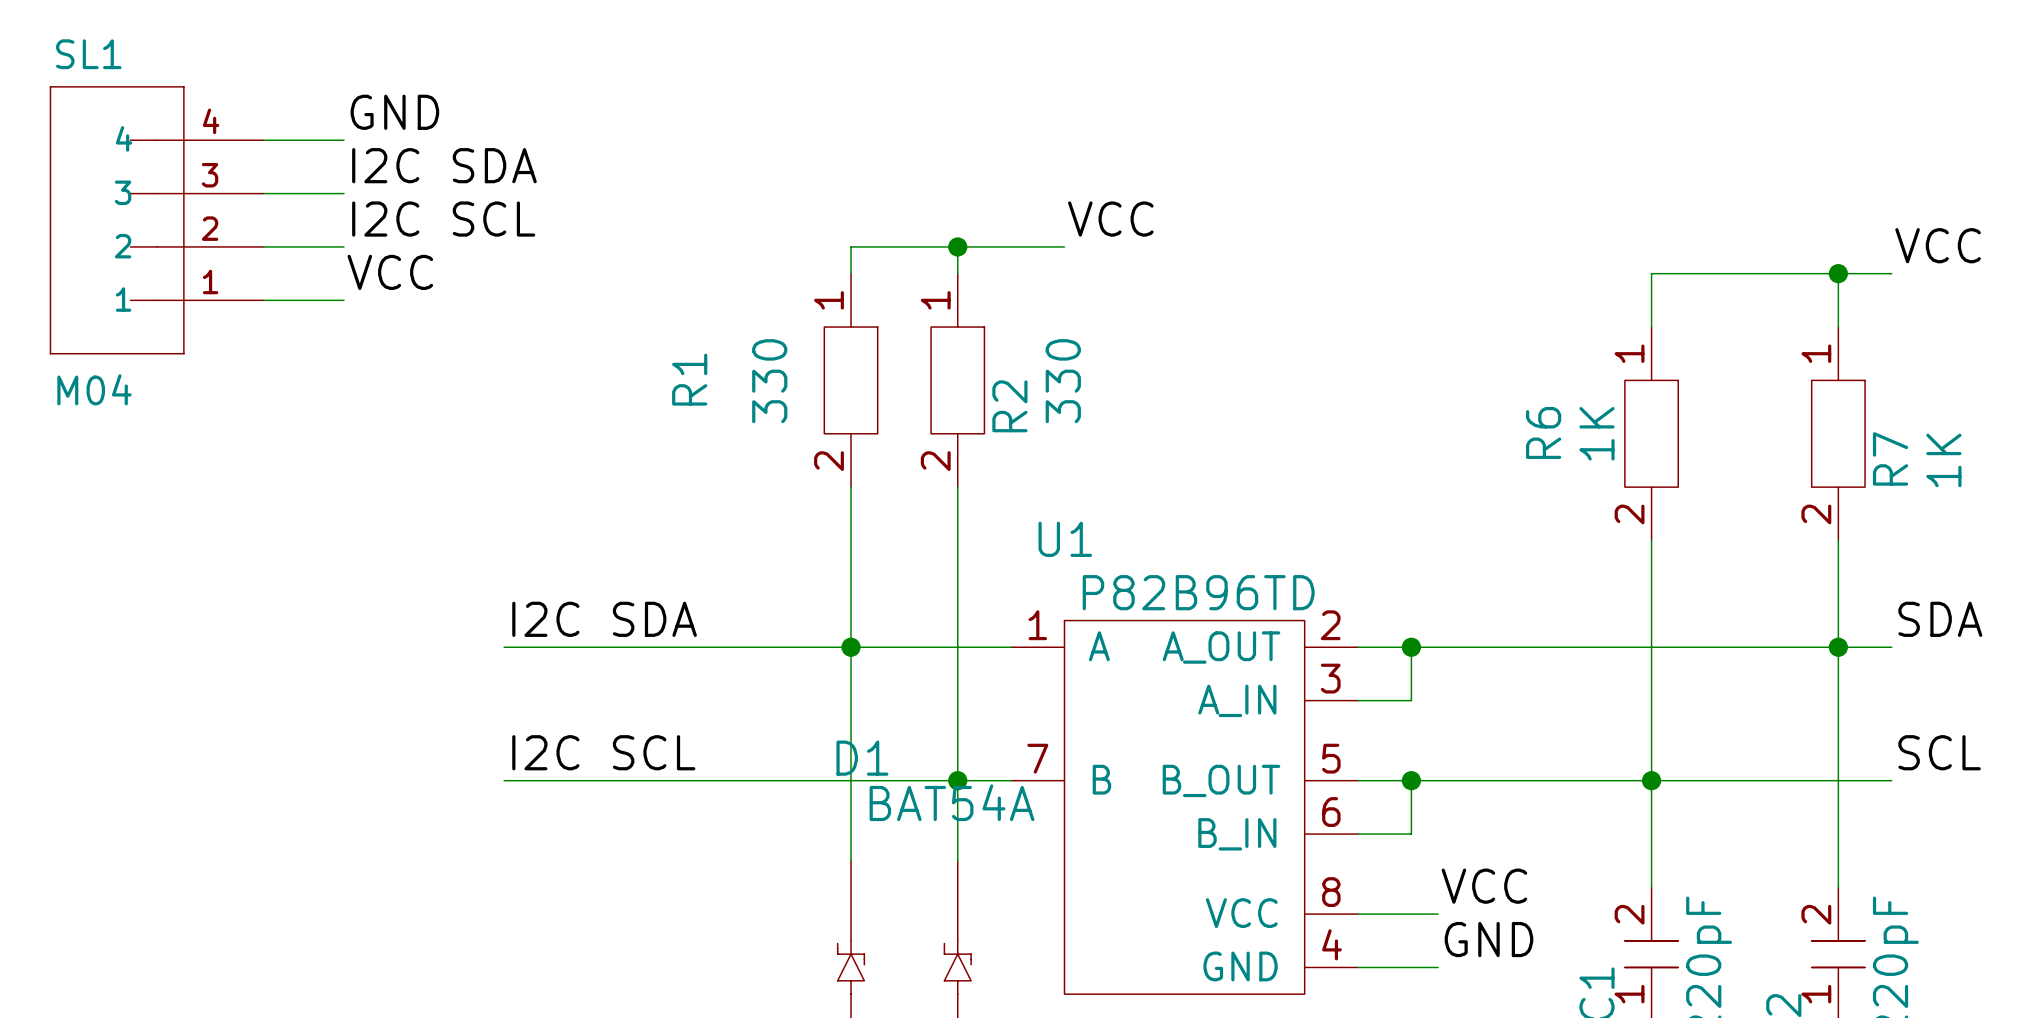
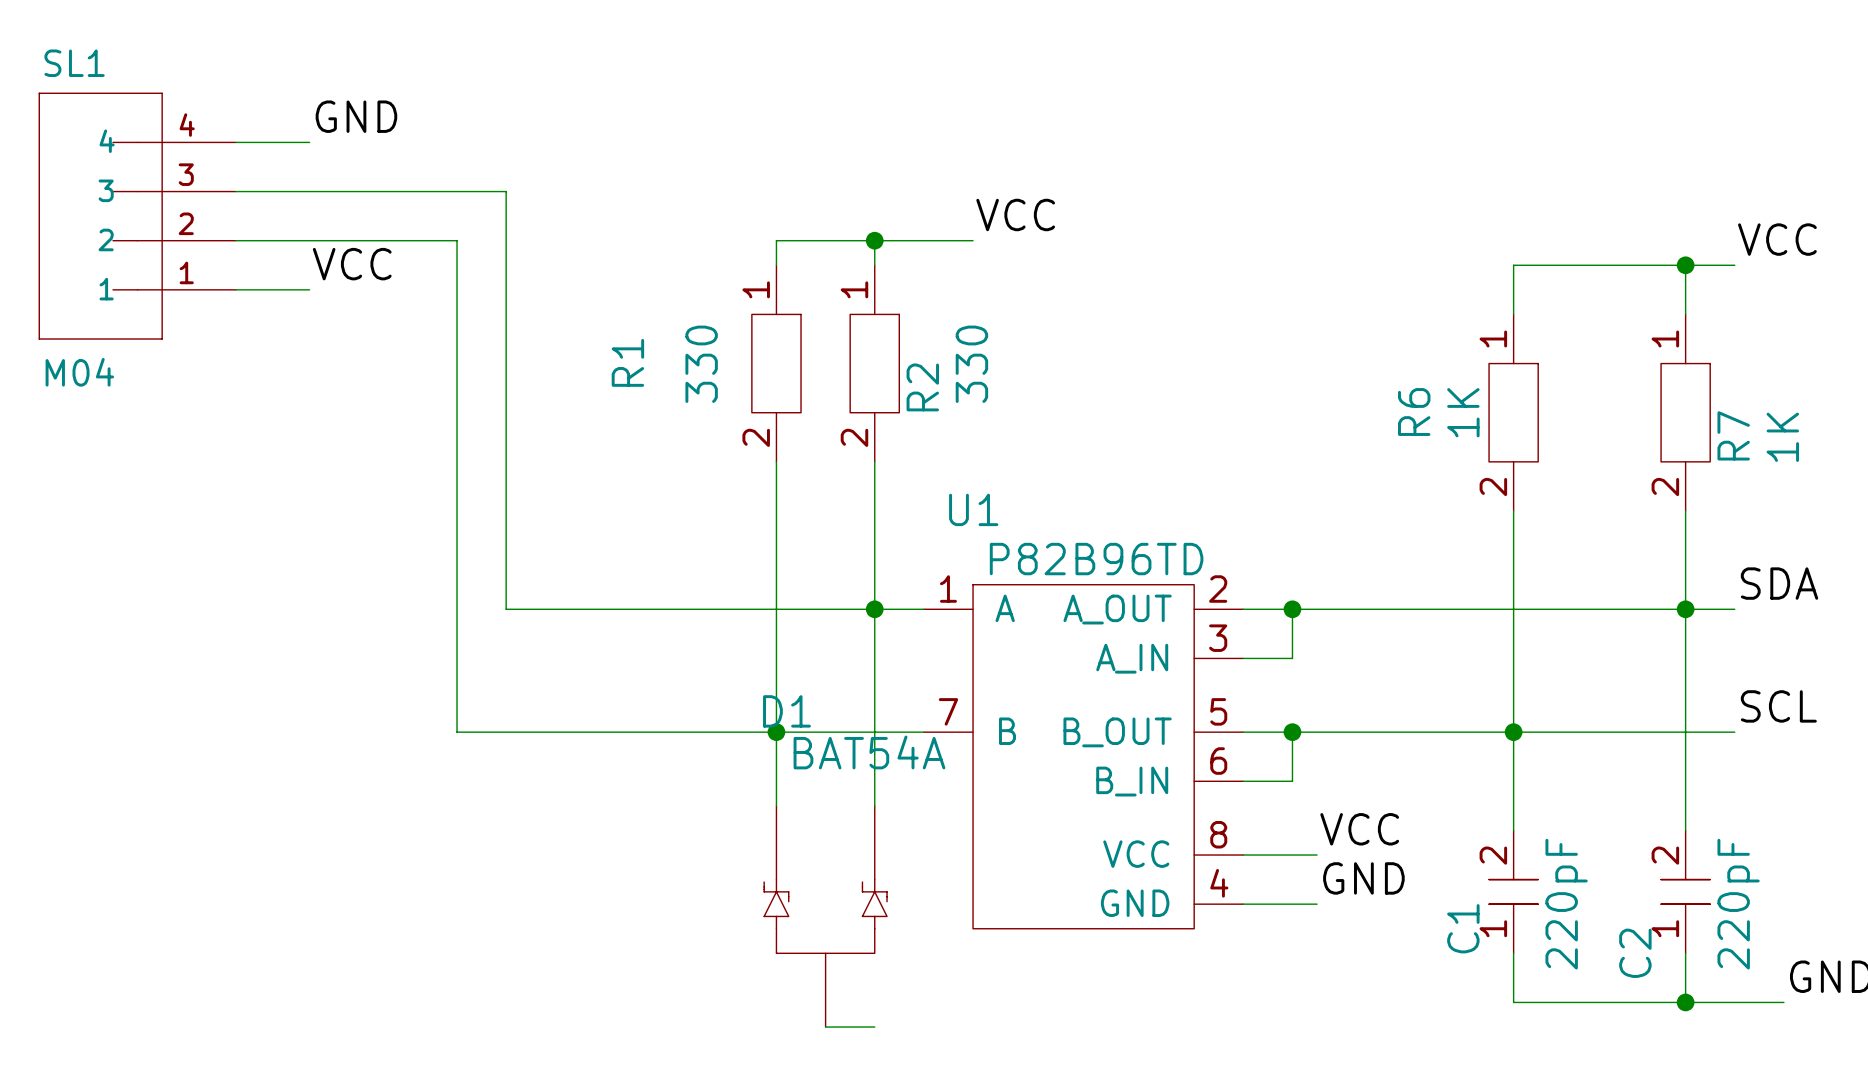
label: I2C SDA (444, 165) -> none
label: I2C SCL (443, 219) -> none
wire: none -> (309, 240) (457, 240) (457, 732)
label: I2C SDA (604, 619) -> none
wire: (504, 647) (557, 647) -> (309, 191) (506, 191) (506, 609)
junction: (851, 647) -> none
junction: none -> (874, 609)
label: I2C SCL (603, 752) -> none
junction: none -> (776, 732)
junction: (957, 780) -> none

